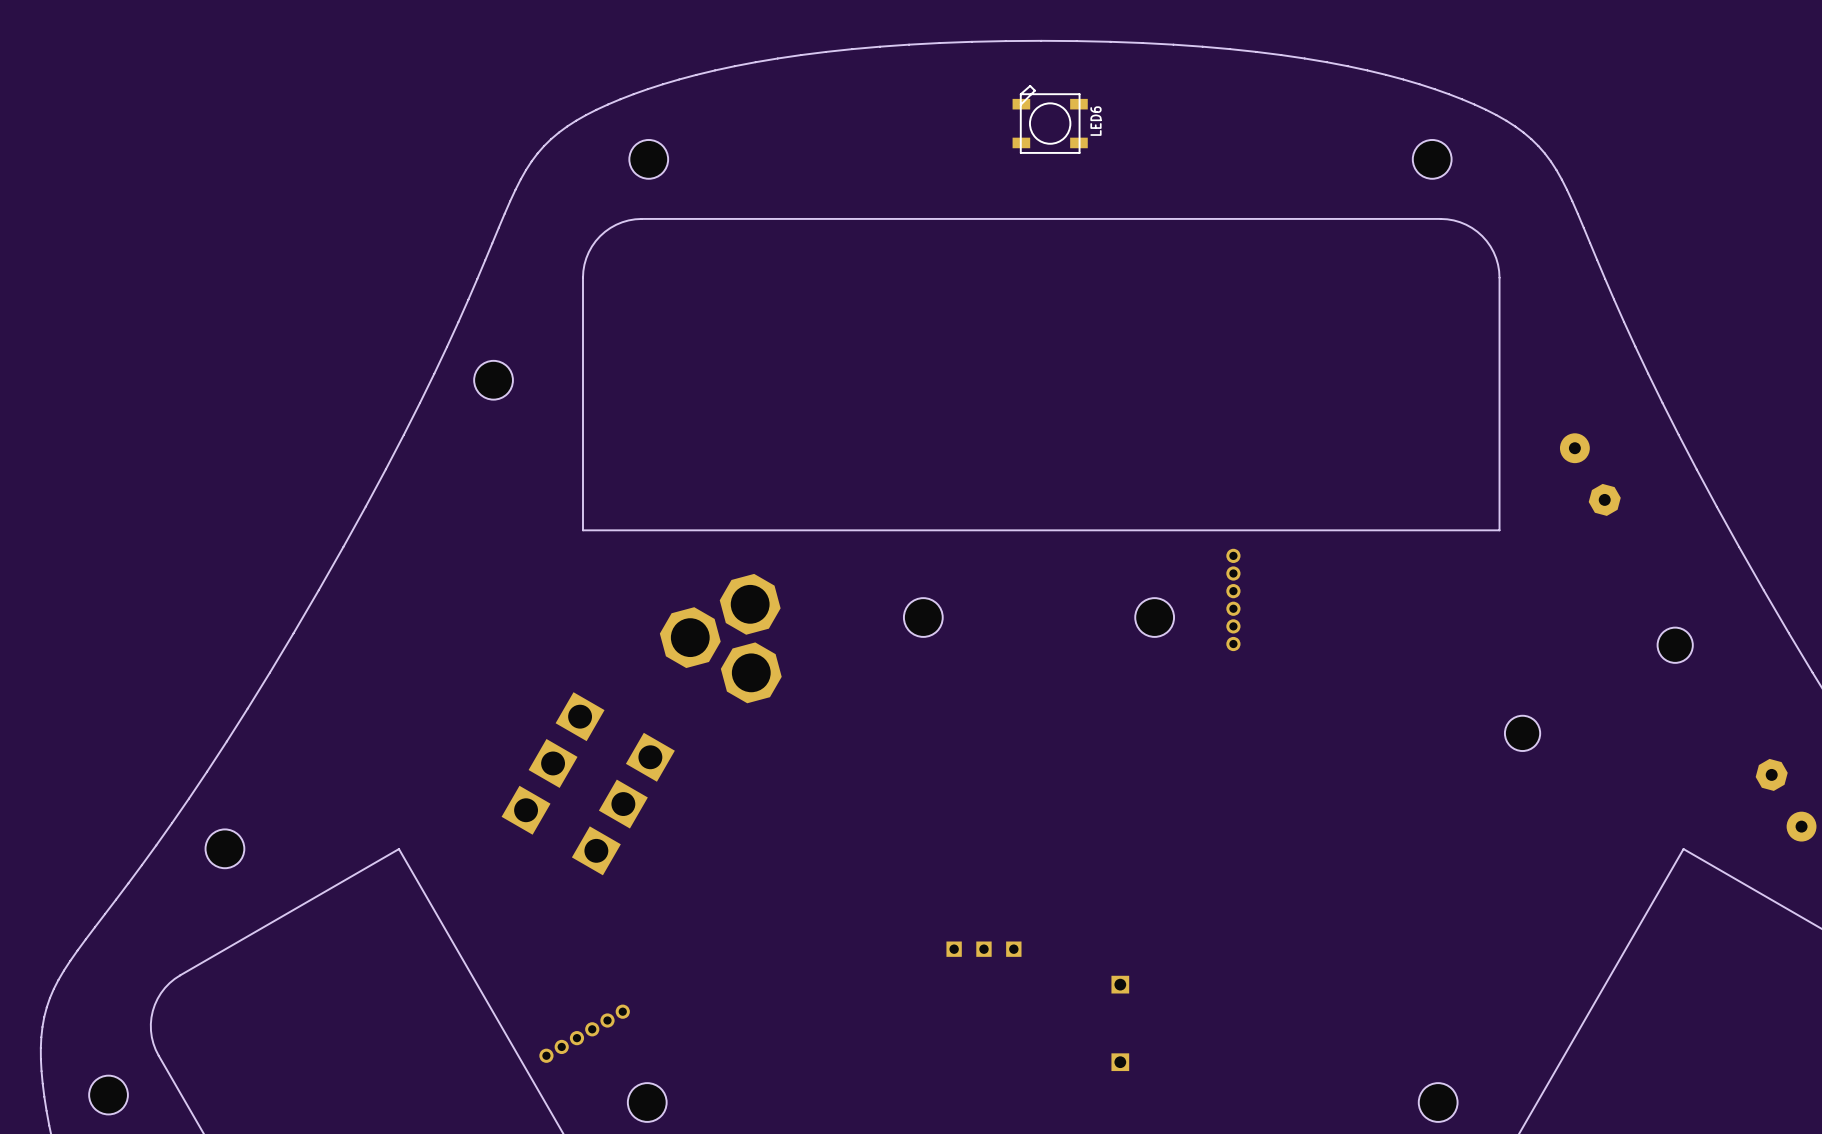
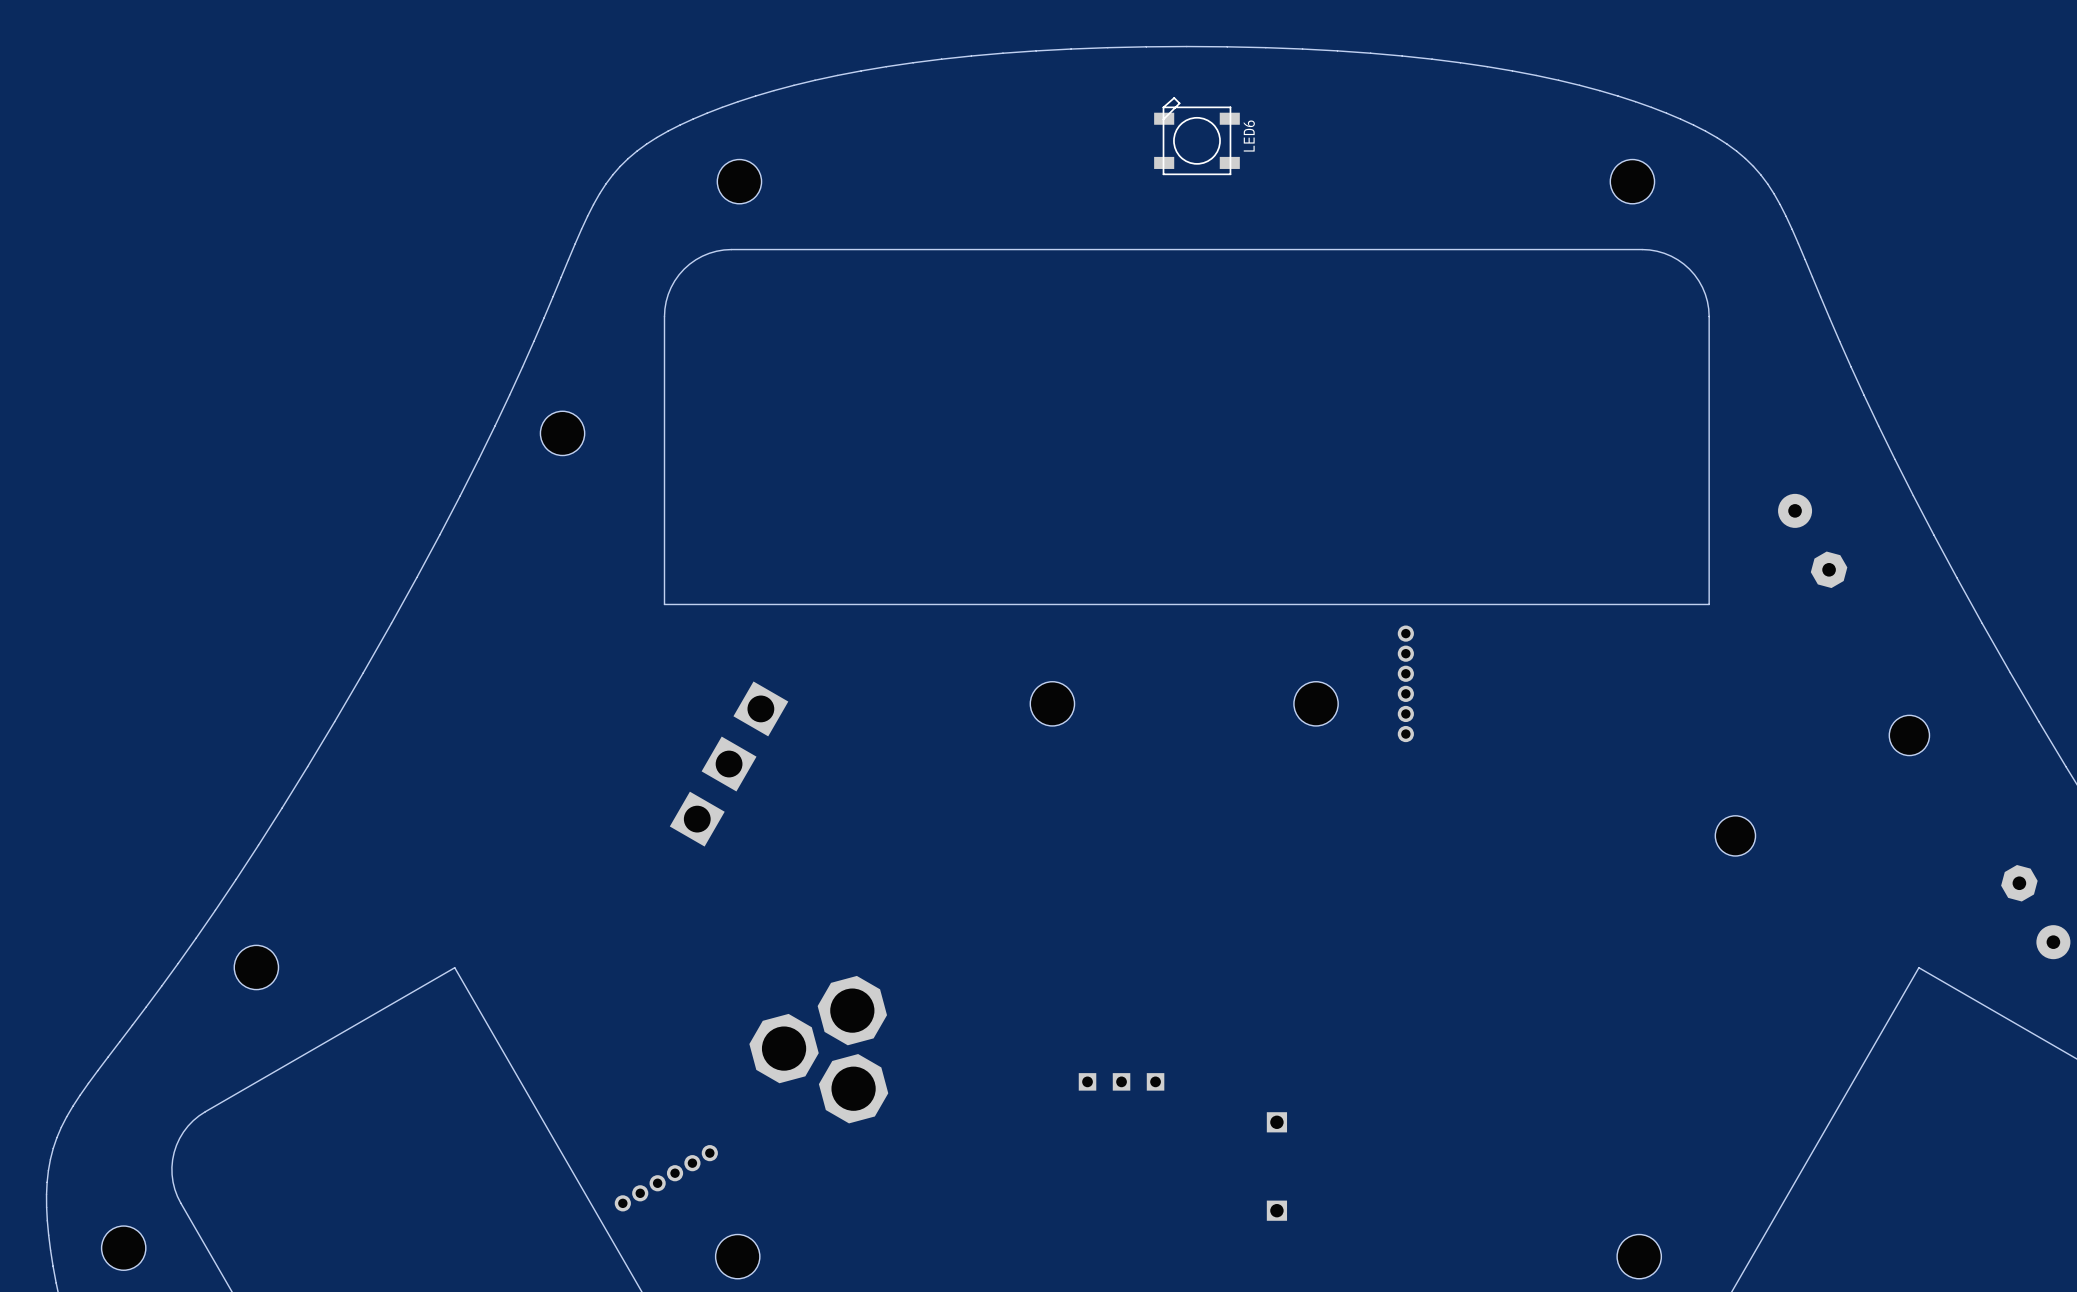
part position: (720, 638) -> (818, 1049)
part: none -> (729, 764)
part: (588, 783) -> none

